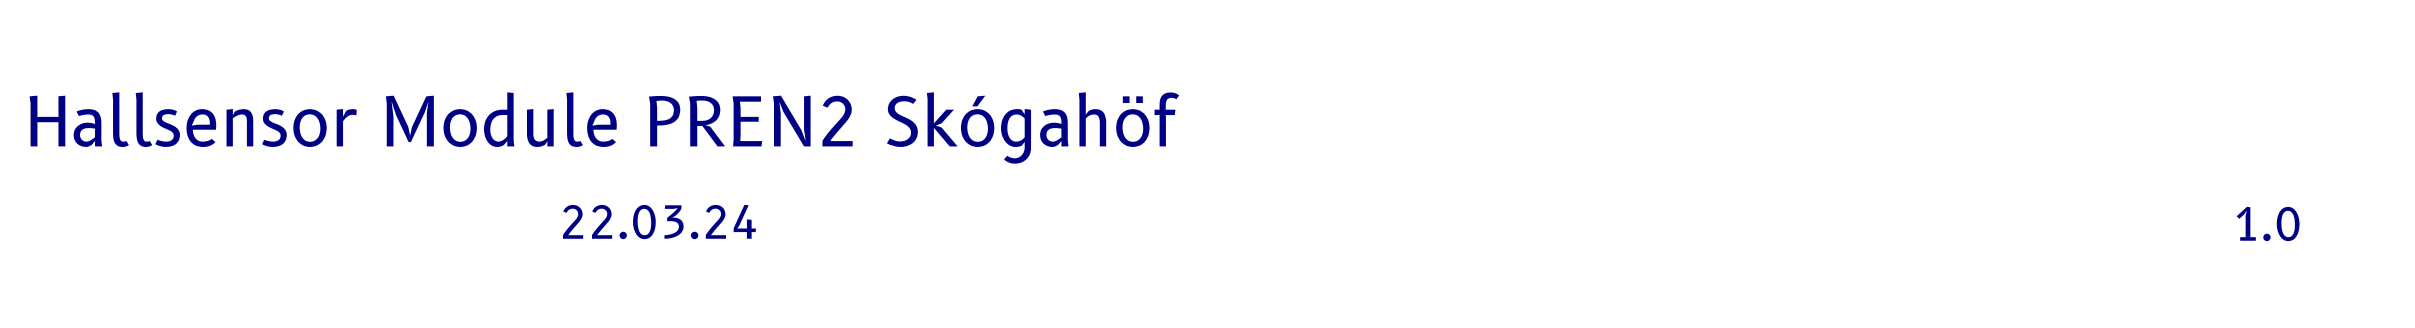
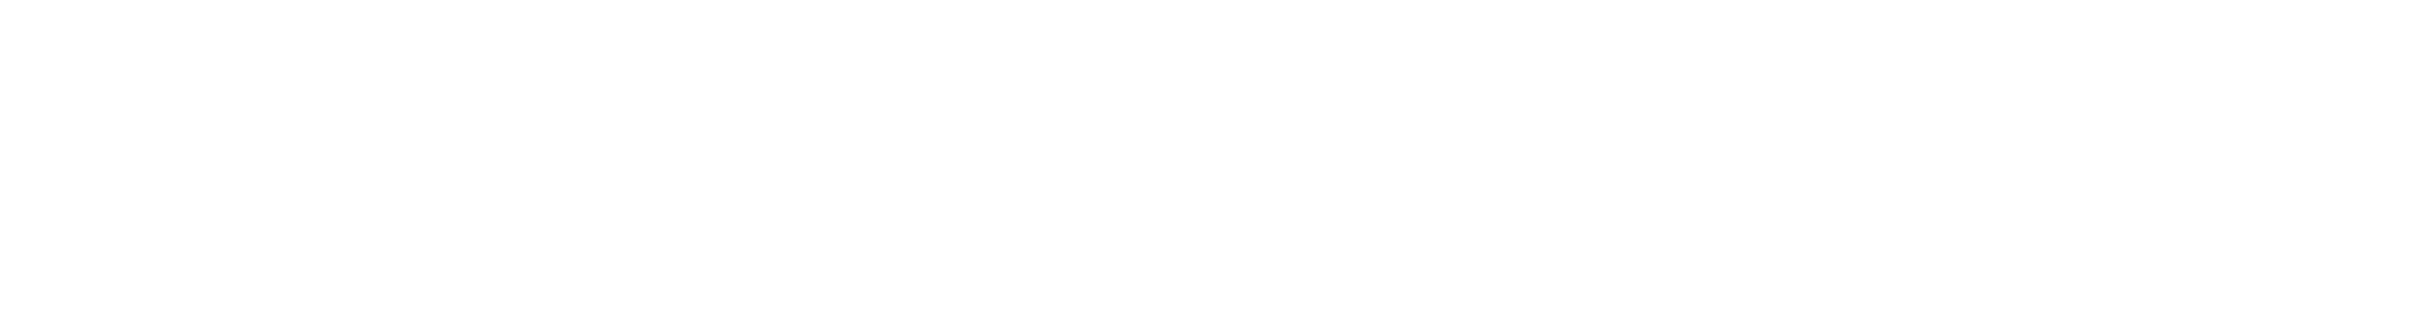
text: Hallsensor Module PREN2 Skógahöf (604, 128) -> none
text: 22.03.24 (659, 222) -> none
text: 1.0 (2268, 223) -> none

